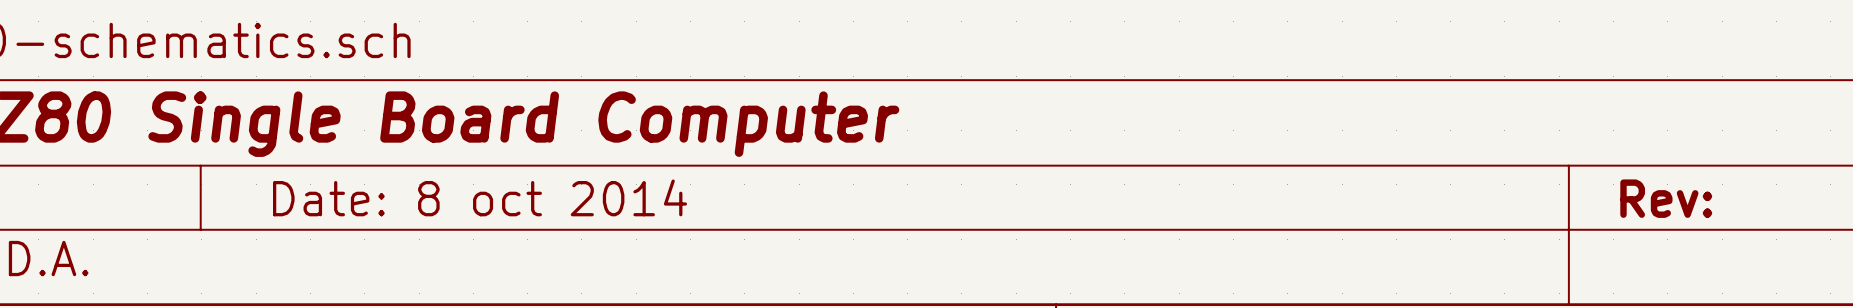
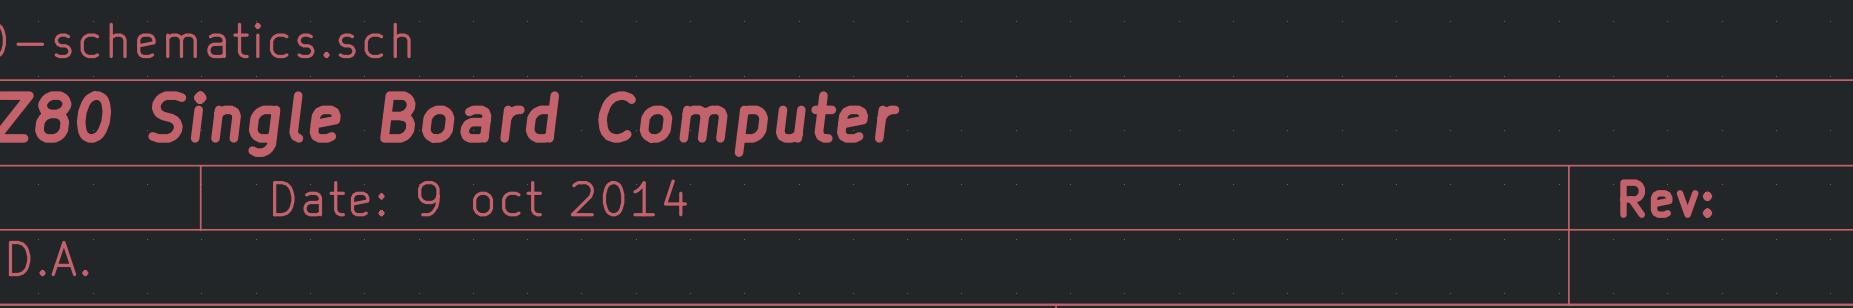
title block: Date: 8 oct 2014 (480, 197) -> Date: 9 oct 2014 (480, 197)

